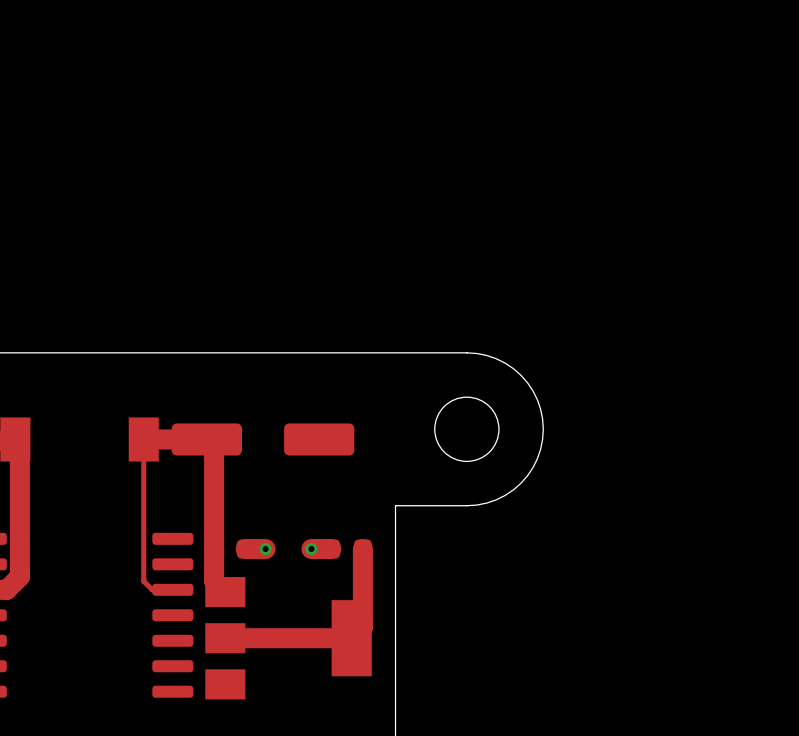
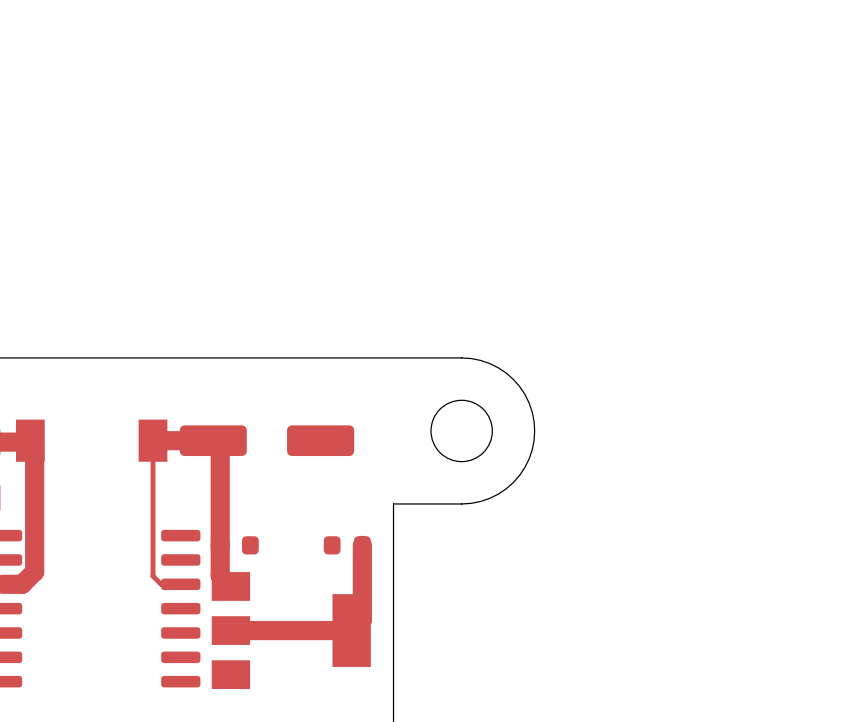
top track: (265, 549) (245, 549) -> none
via: (265, 549) -> none
via: (311, 549) -> none
top track: (331, 549) (311, 549) -> none

